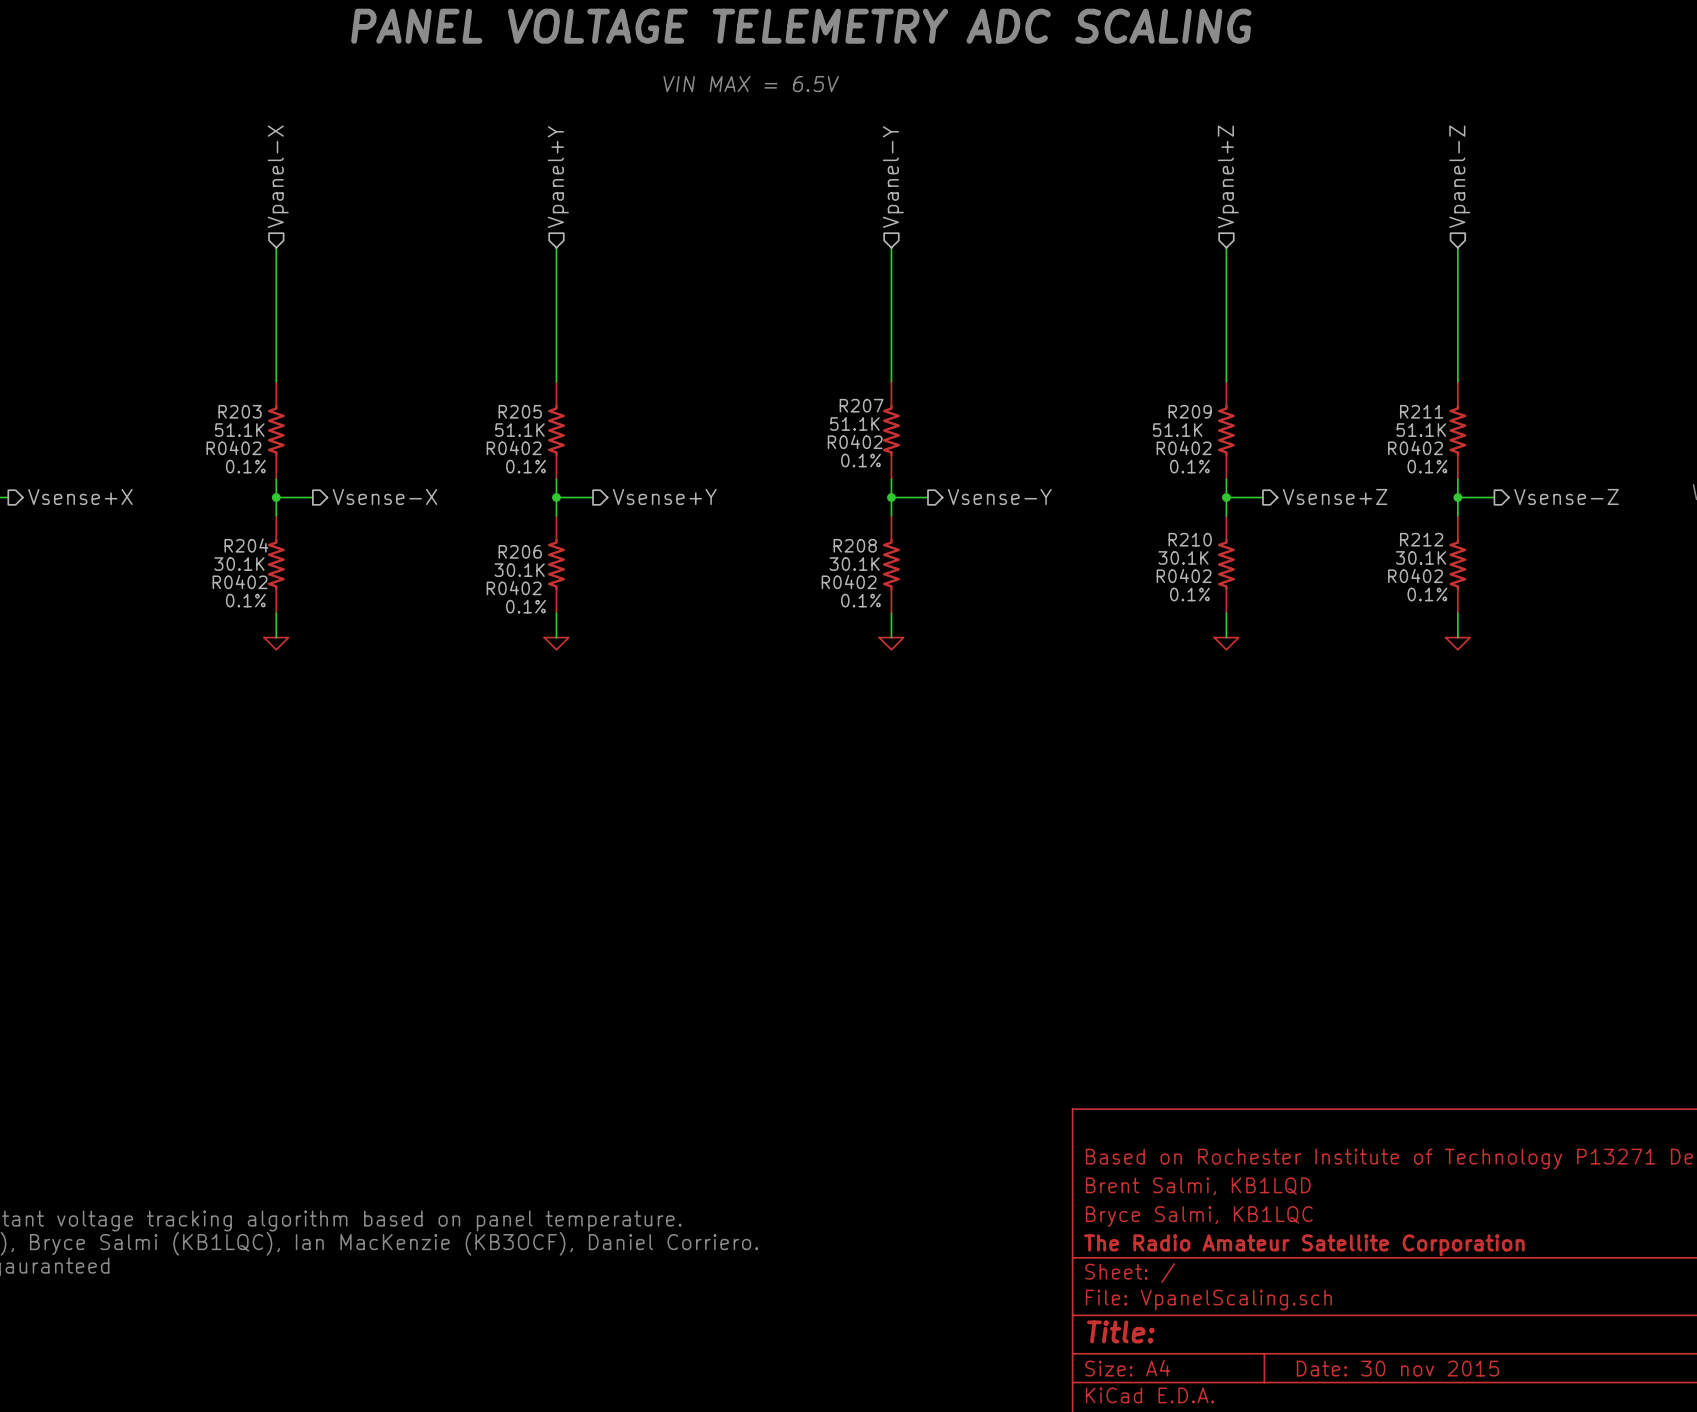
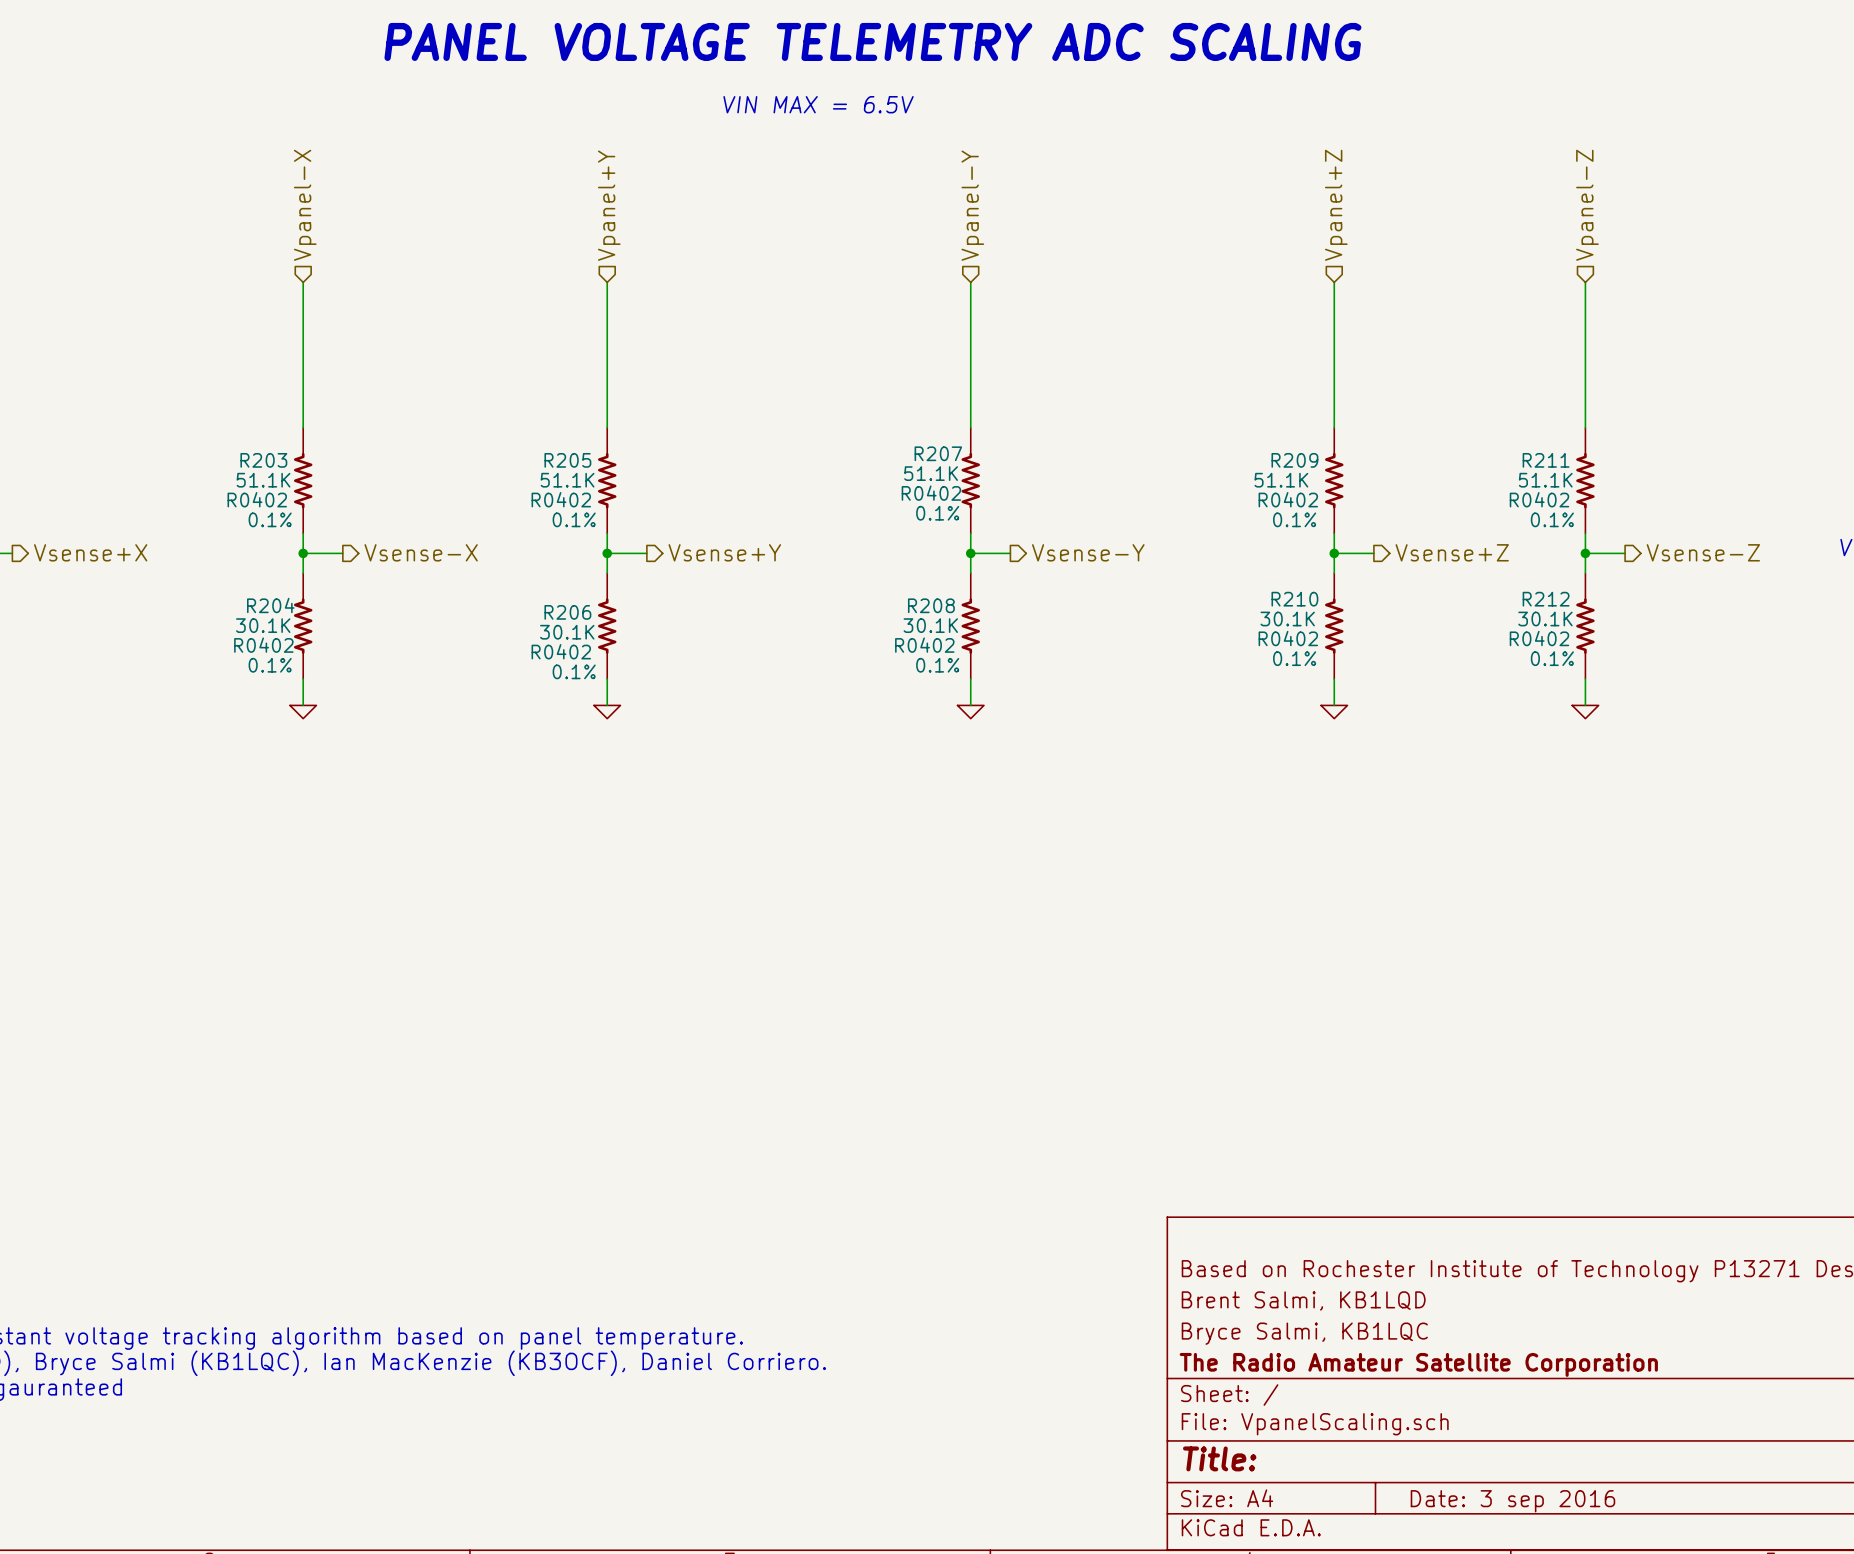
title block: Date: 30 nov 2015 (1397, 1368) -> Date: 3 sep 2016 (1512, 1501)

